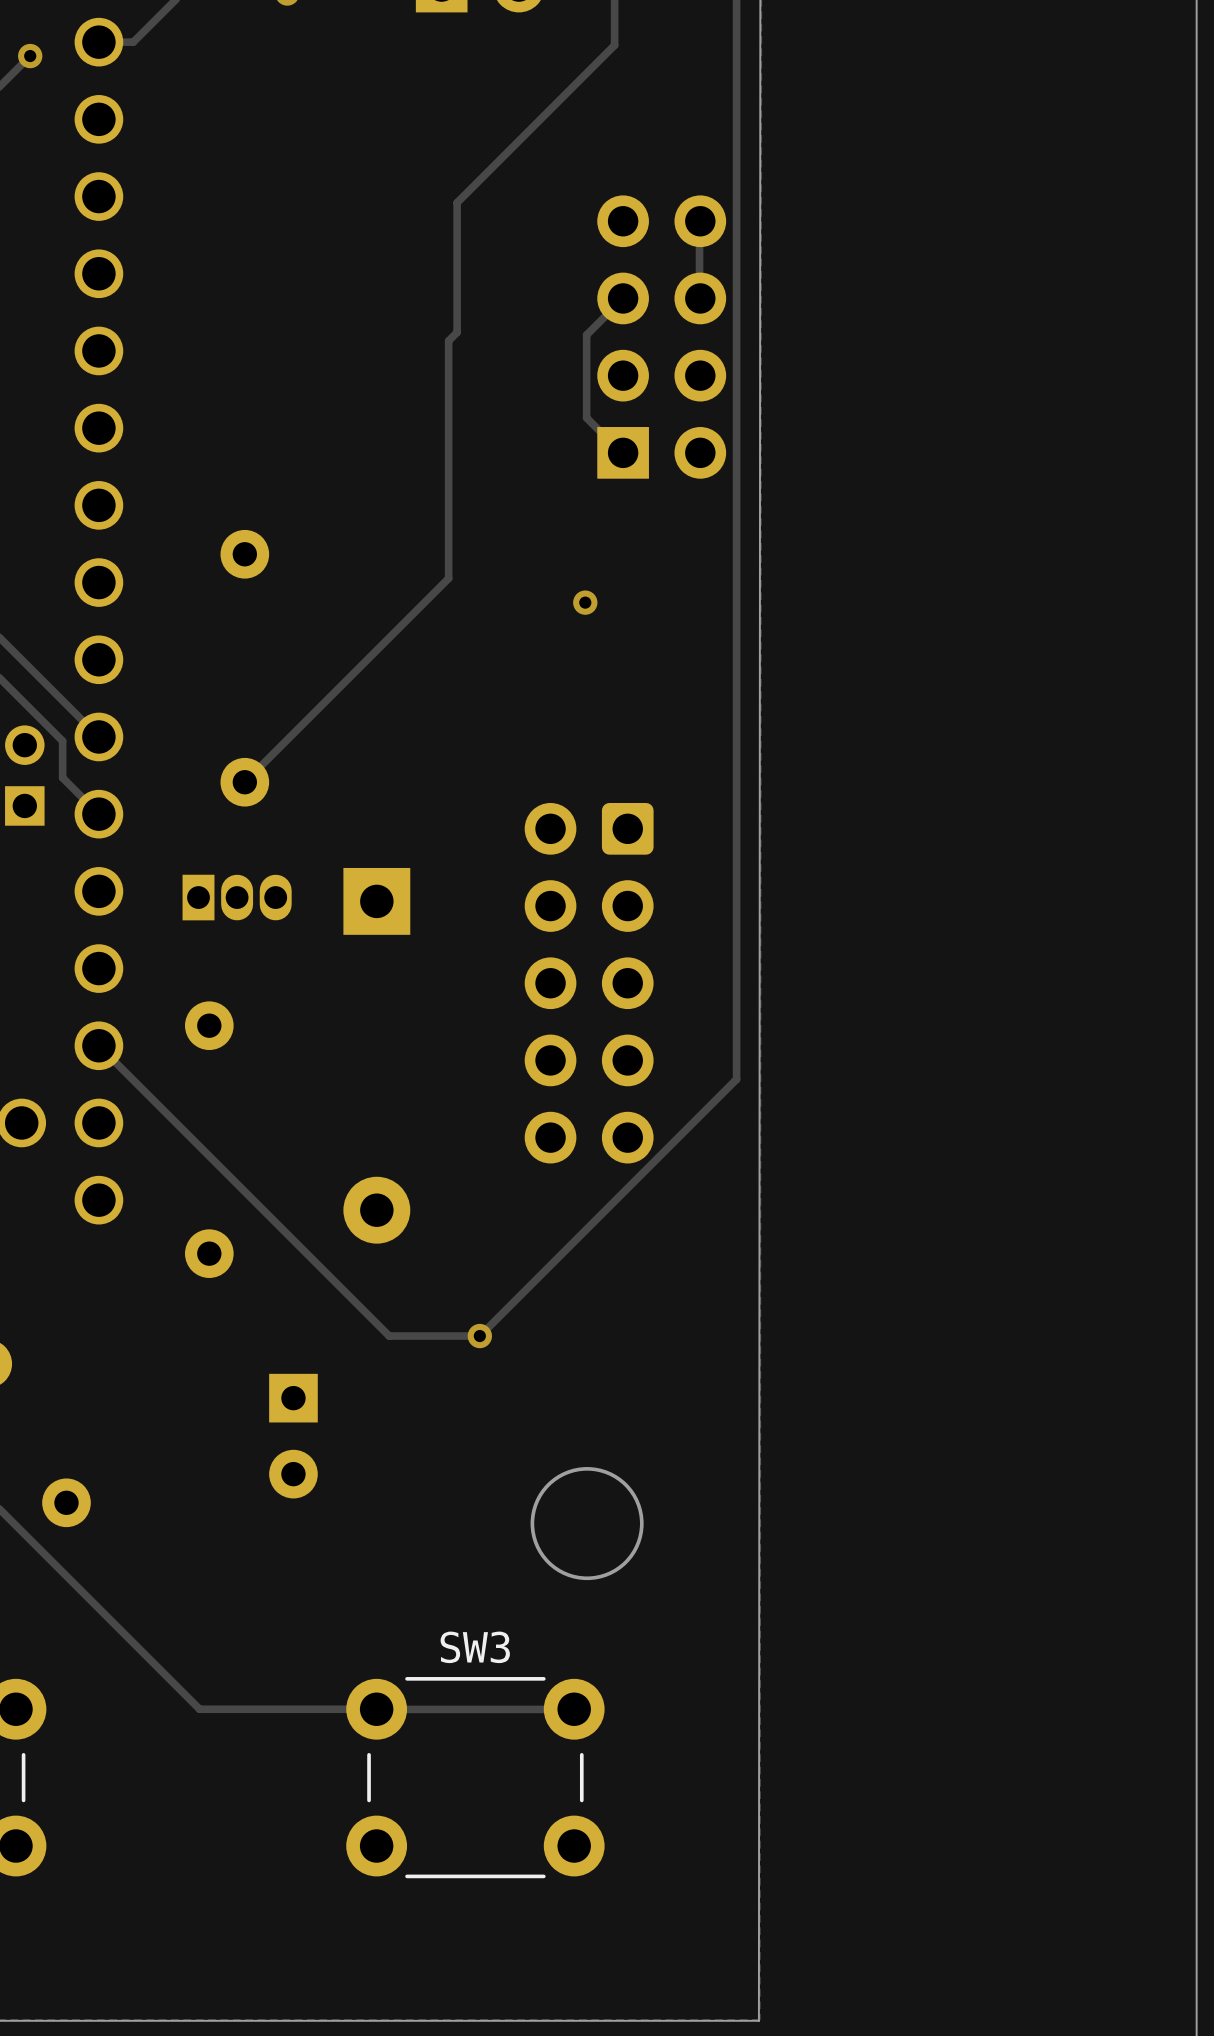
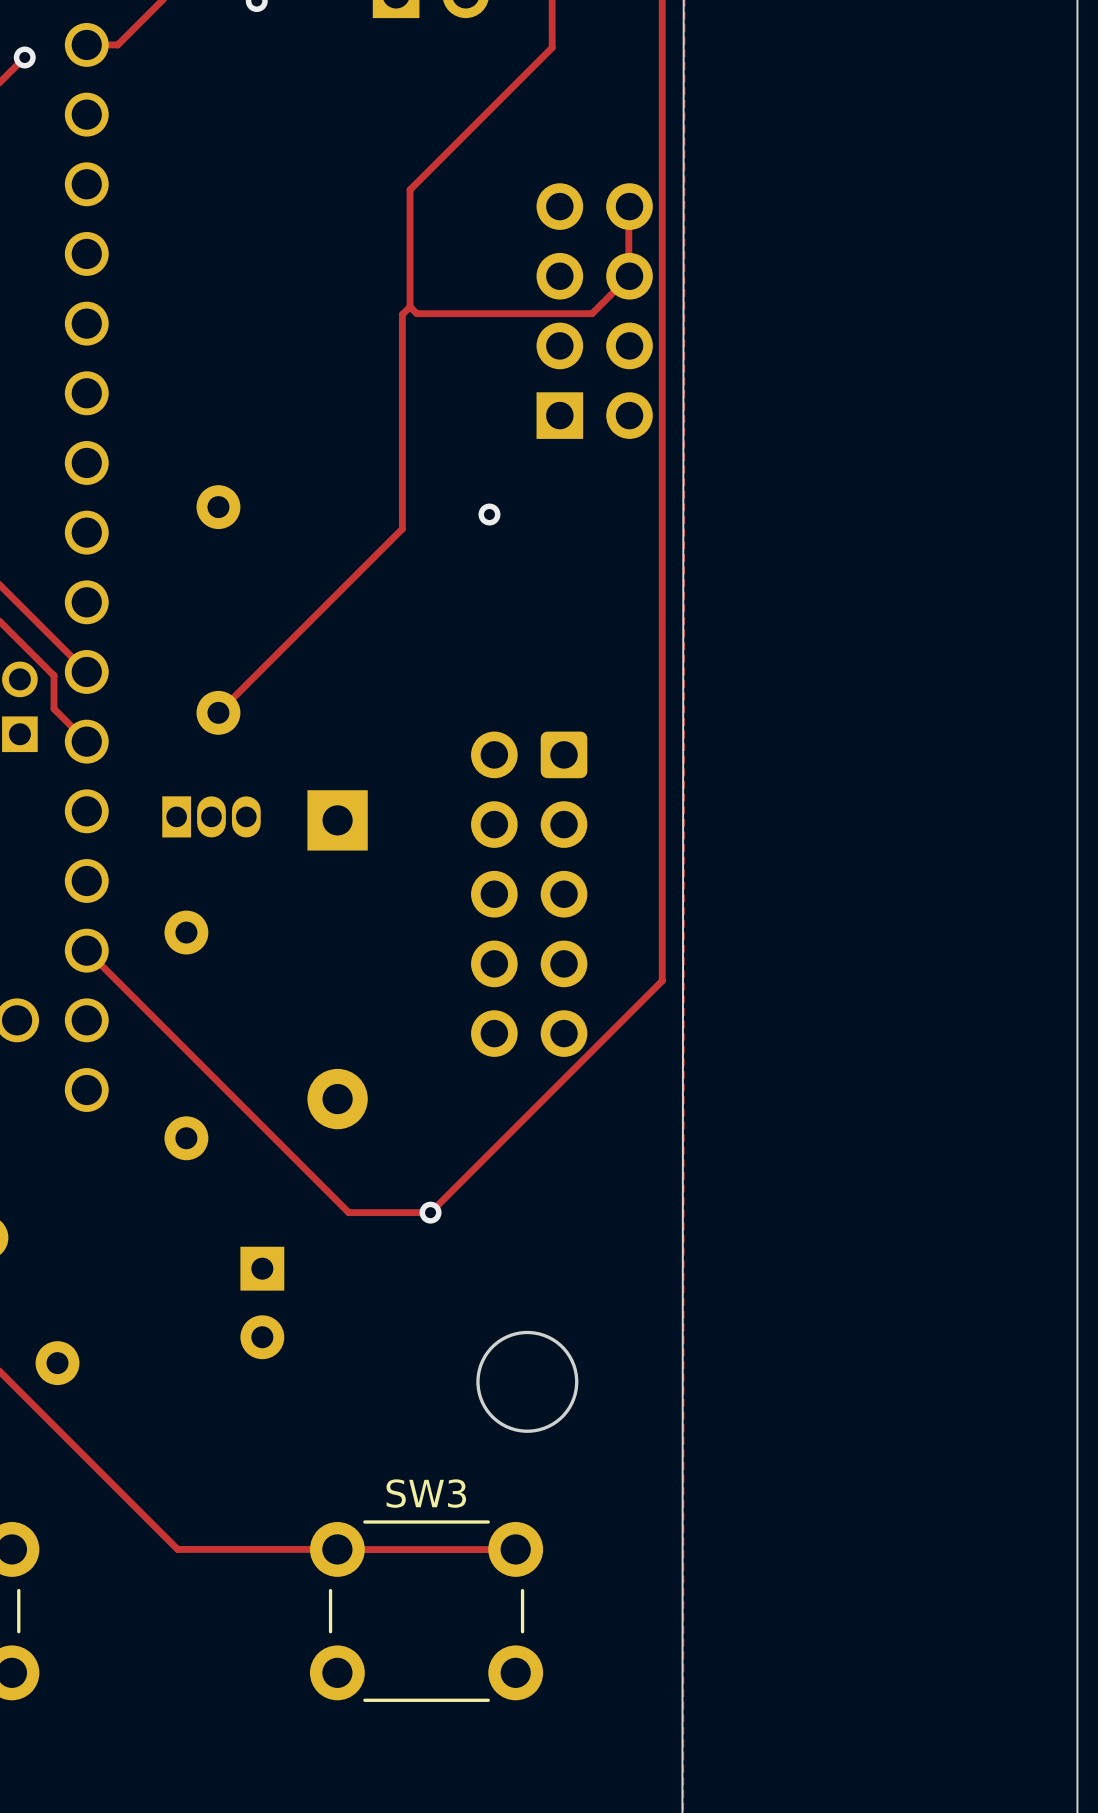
track: none -> (629, 276) (592, 313) (416, 313) (410, 306)
track: (622, 299) (586, 334) (586, 417) (622, 453) -> none
via position: (585, 602) -> (489, 514)

